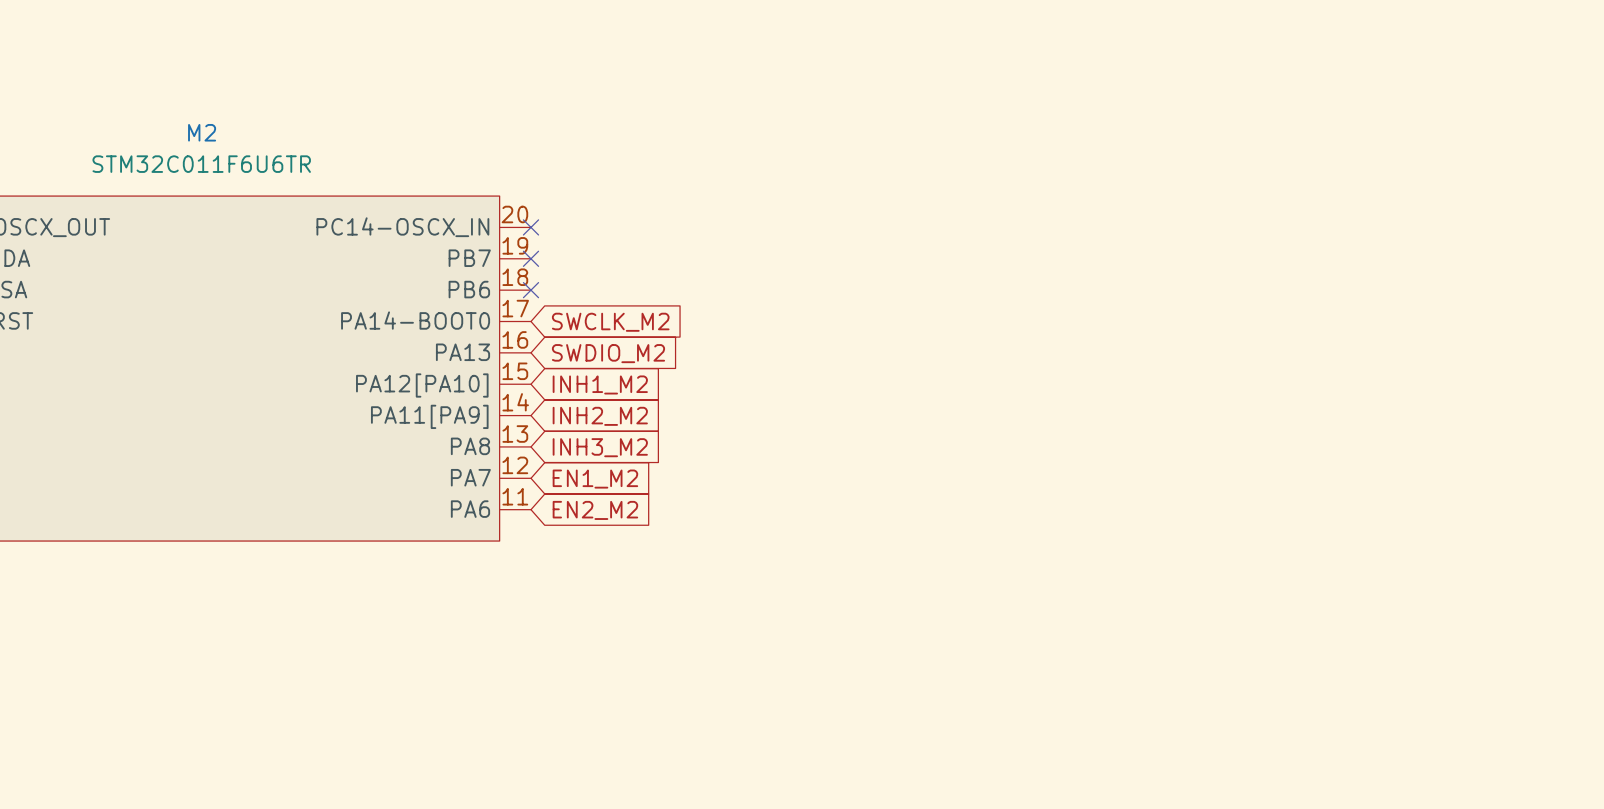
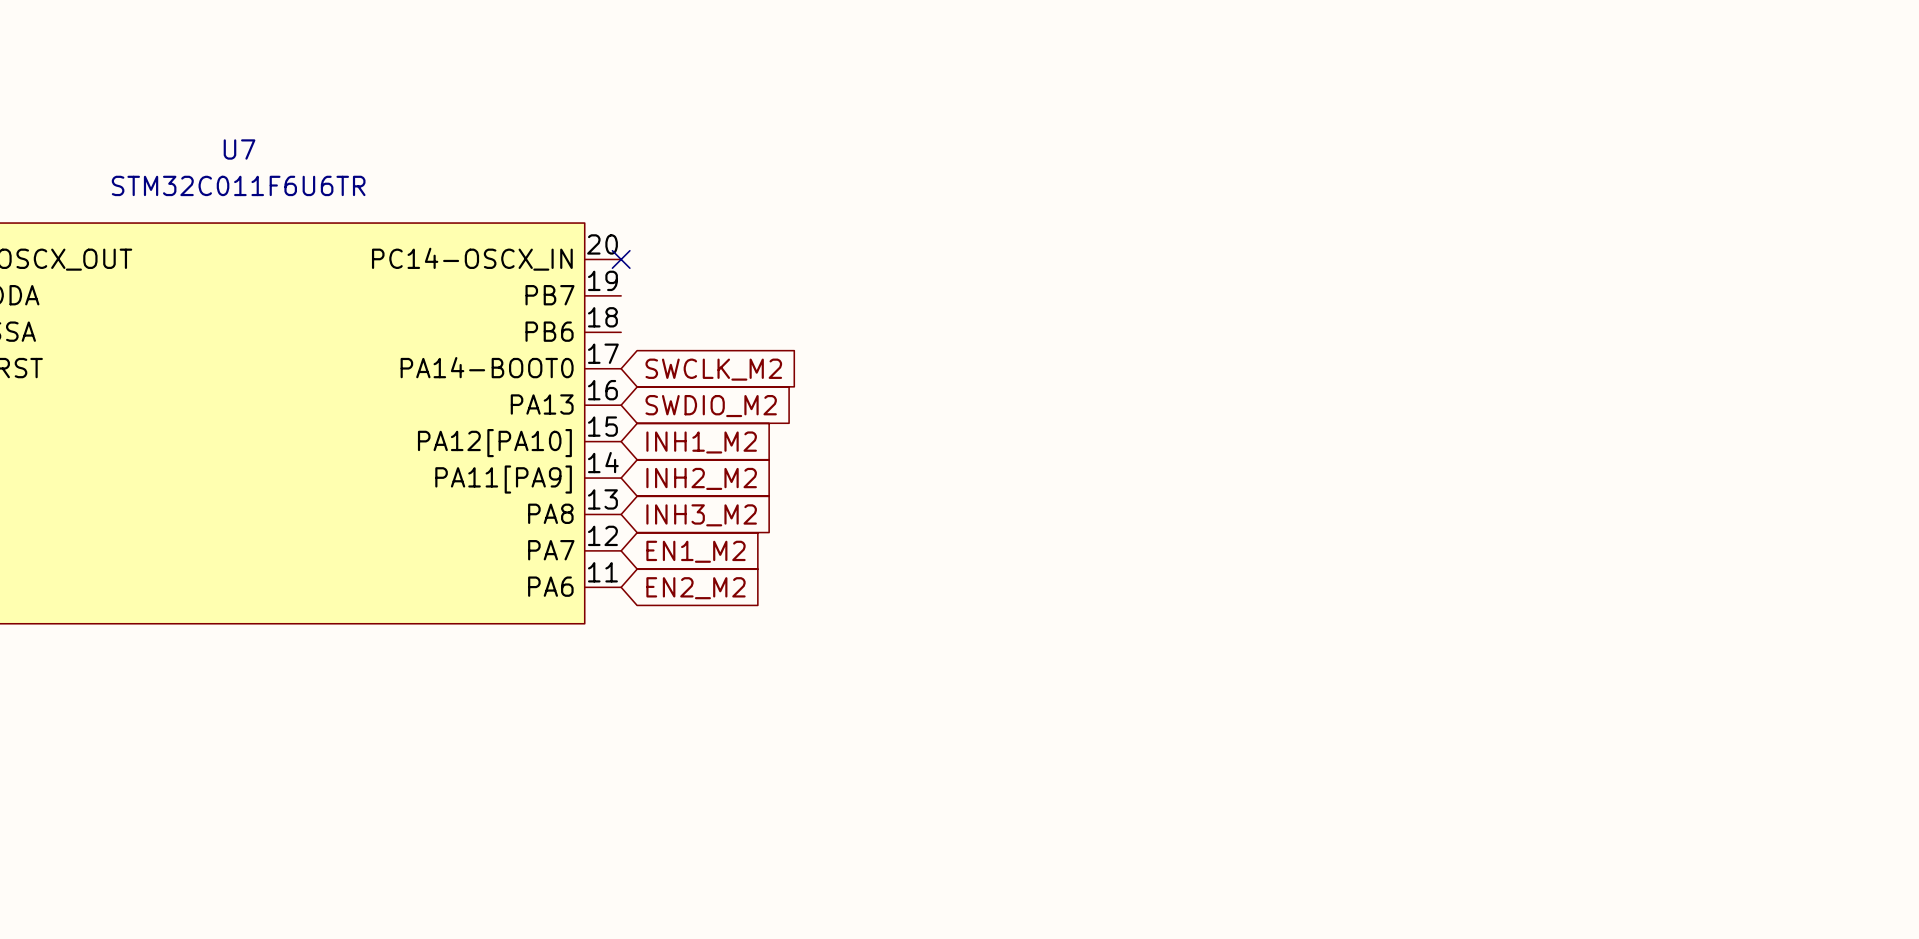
M2 name: M2 (202, 132) -> U7 (239, 149)
no-connect mark: (530, 258) -> none
no-connect mark: (530, 290) -> none

